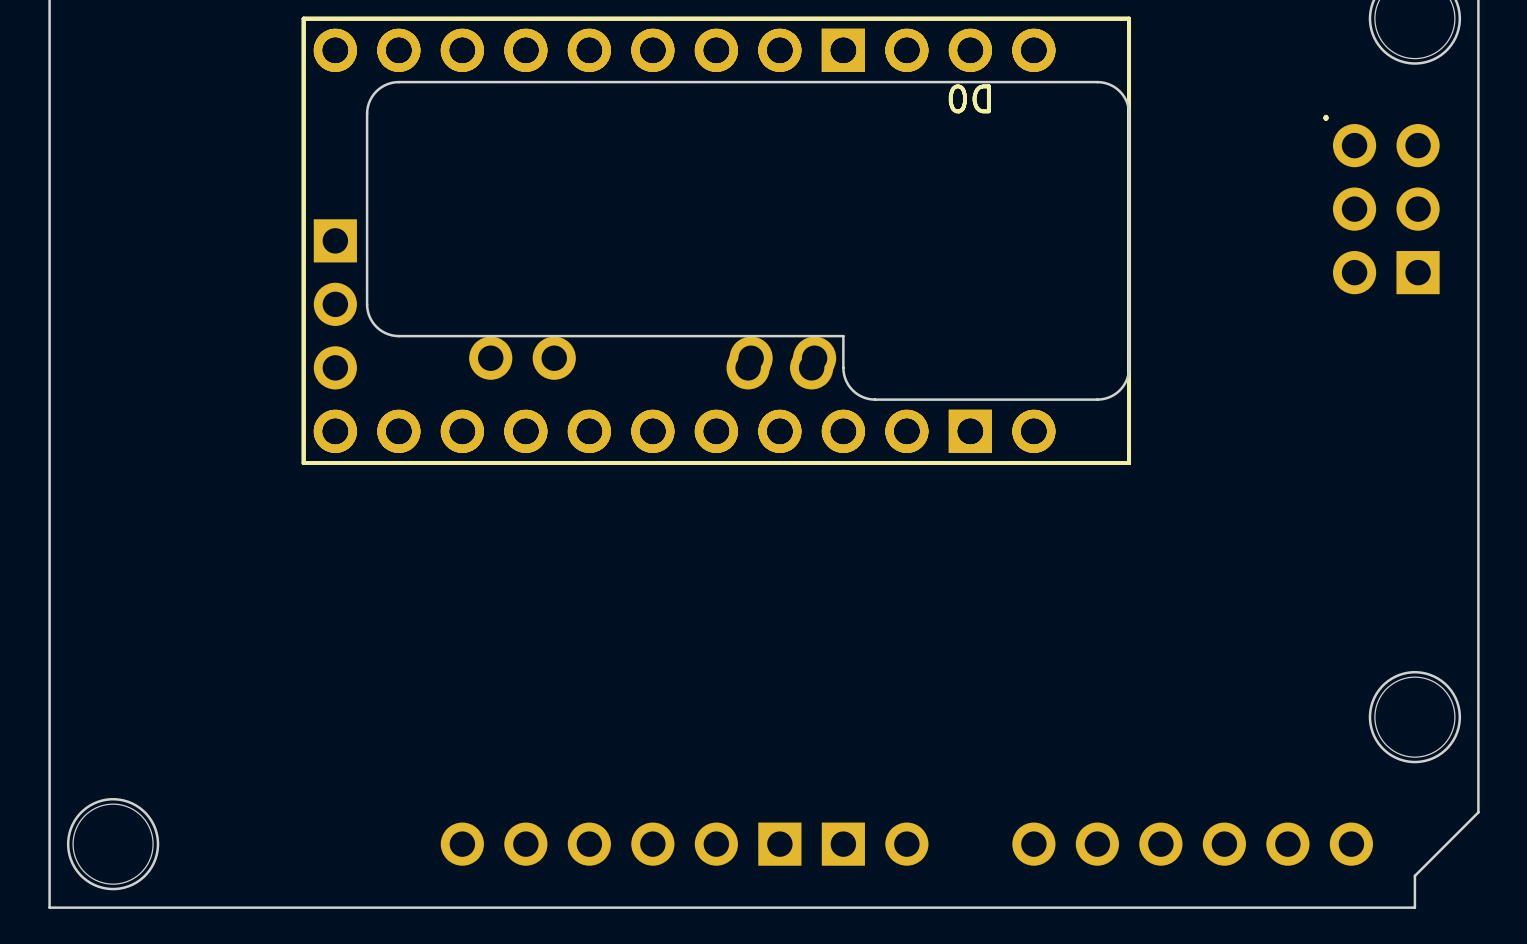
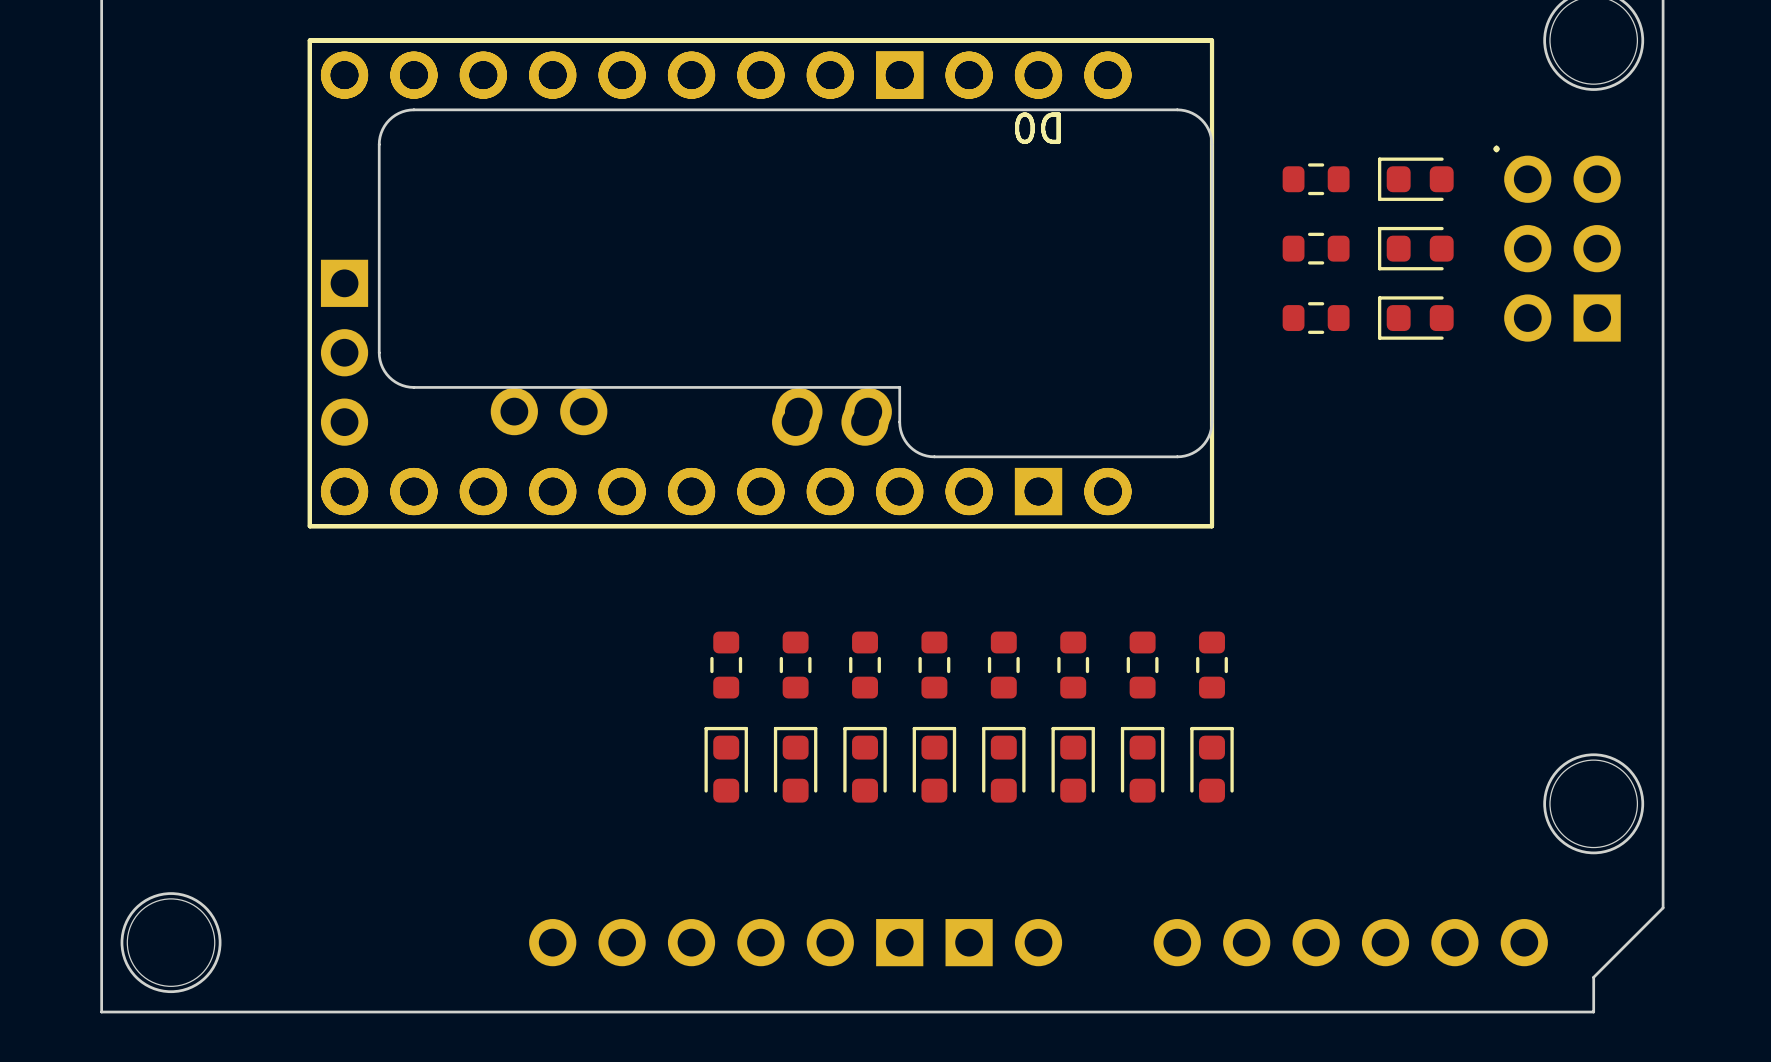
board edge: (398, 82) (385, 85) (376, 91) (370, 100) (367, 113) (367, 307) (371, 321) (379, 329) (388, 334) (398, 336) -> (483, 109) (413, 109) (402, 111) (392, 117) (384, 126) (379, 144) (379, 352) (382, 367) (392, 379) (406, 386) (483, 387)
board edge: (1033, 82) (1097, 82) (1107, 83) (1122, 94) (1127, 103) (1129, 113) (1129, 367) (1127, 378) (1117, 392) (1104, 398) (1033, 399) -> (1177, 109) (1192, 113) (1201, 120) (1208, 129) (1212, 144) (1211, 426) (1208, 437) (1201, 446) (1192, 453) (1177, 456)
part: none -> (1316, 179)
part: none -> (1415, 179)
part: none -> (1316, 248)
part: none -> (1415, 248)
part position: (716, 240) -> (760, 283)
part position: (716, 240) -> (760, 283)
part: none -> (1316, 318)
part: none -> (1415, 318)
board edge: (779, 336) (843, 336) (843, 371) (846, 381) (858, 394) (875, 399) -> (899, 387) (900, 429) (905, 440) (915, 451) (930, 456) (1003, 456)
part: none -> (726, 665)
part: none -> (795, 665)
part: none -> (865, 665)
part: none -> (934, 665)
part: none -> (1003, 665)
part: none -> (1073, 665)
part: none -> (1142, 665)
part: none -> (1212, 665)
part: none -> (726, 764)
part: none -> (795, 764)
part: none -> (865, 764)
part: none -> (934, 764)
part: none -> (1003, 764)
part: none -> (1073, 764)
part: none -> (1142, 764)
part: none -> (1212, 764)

